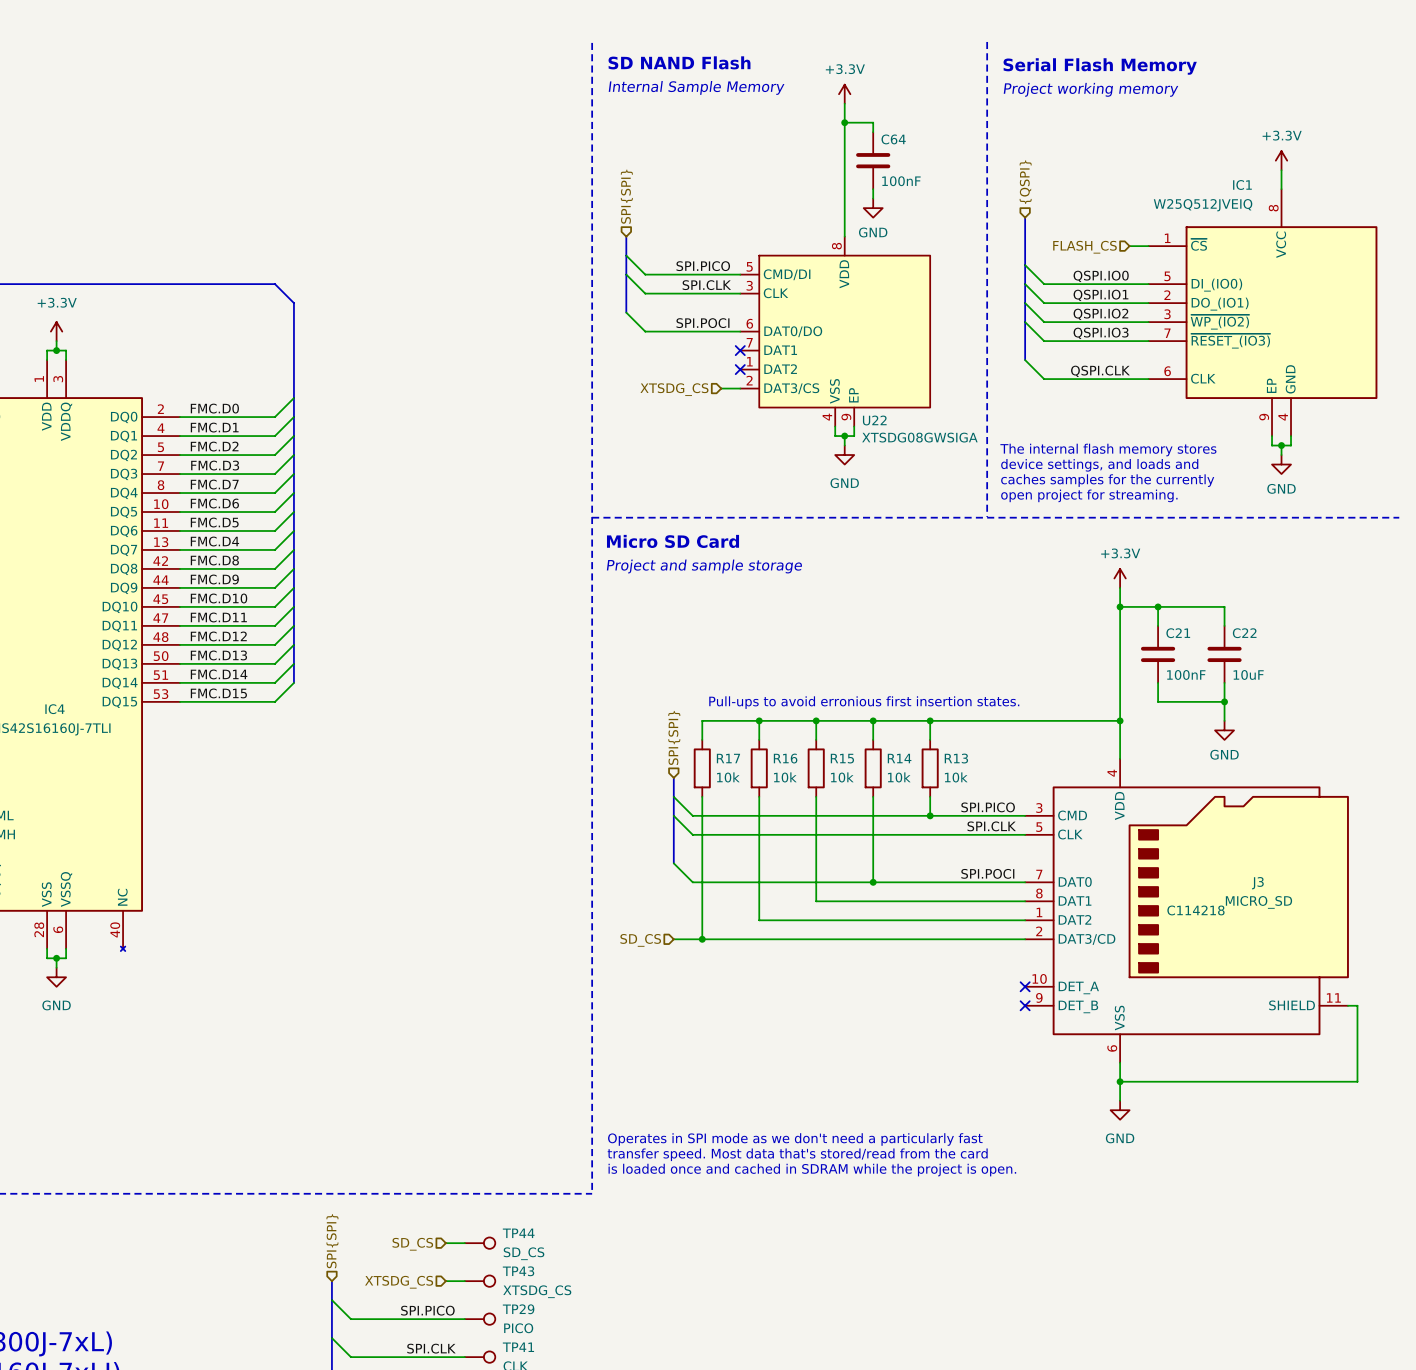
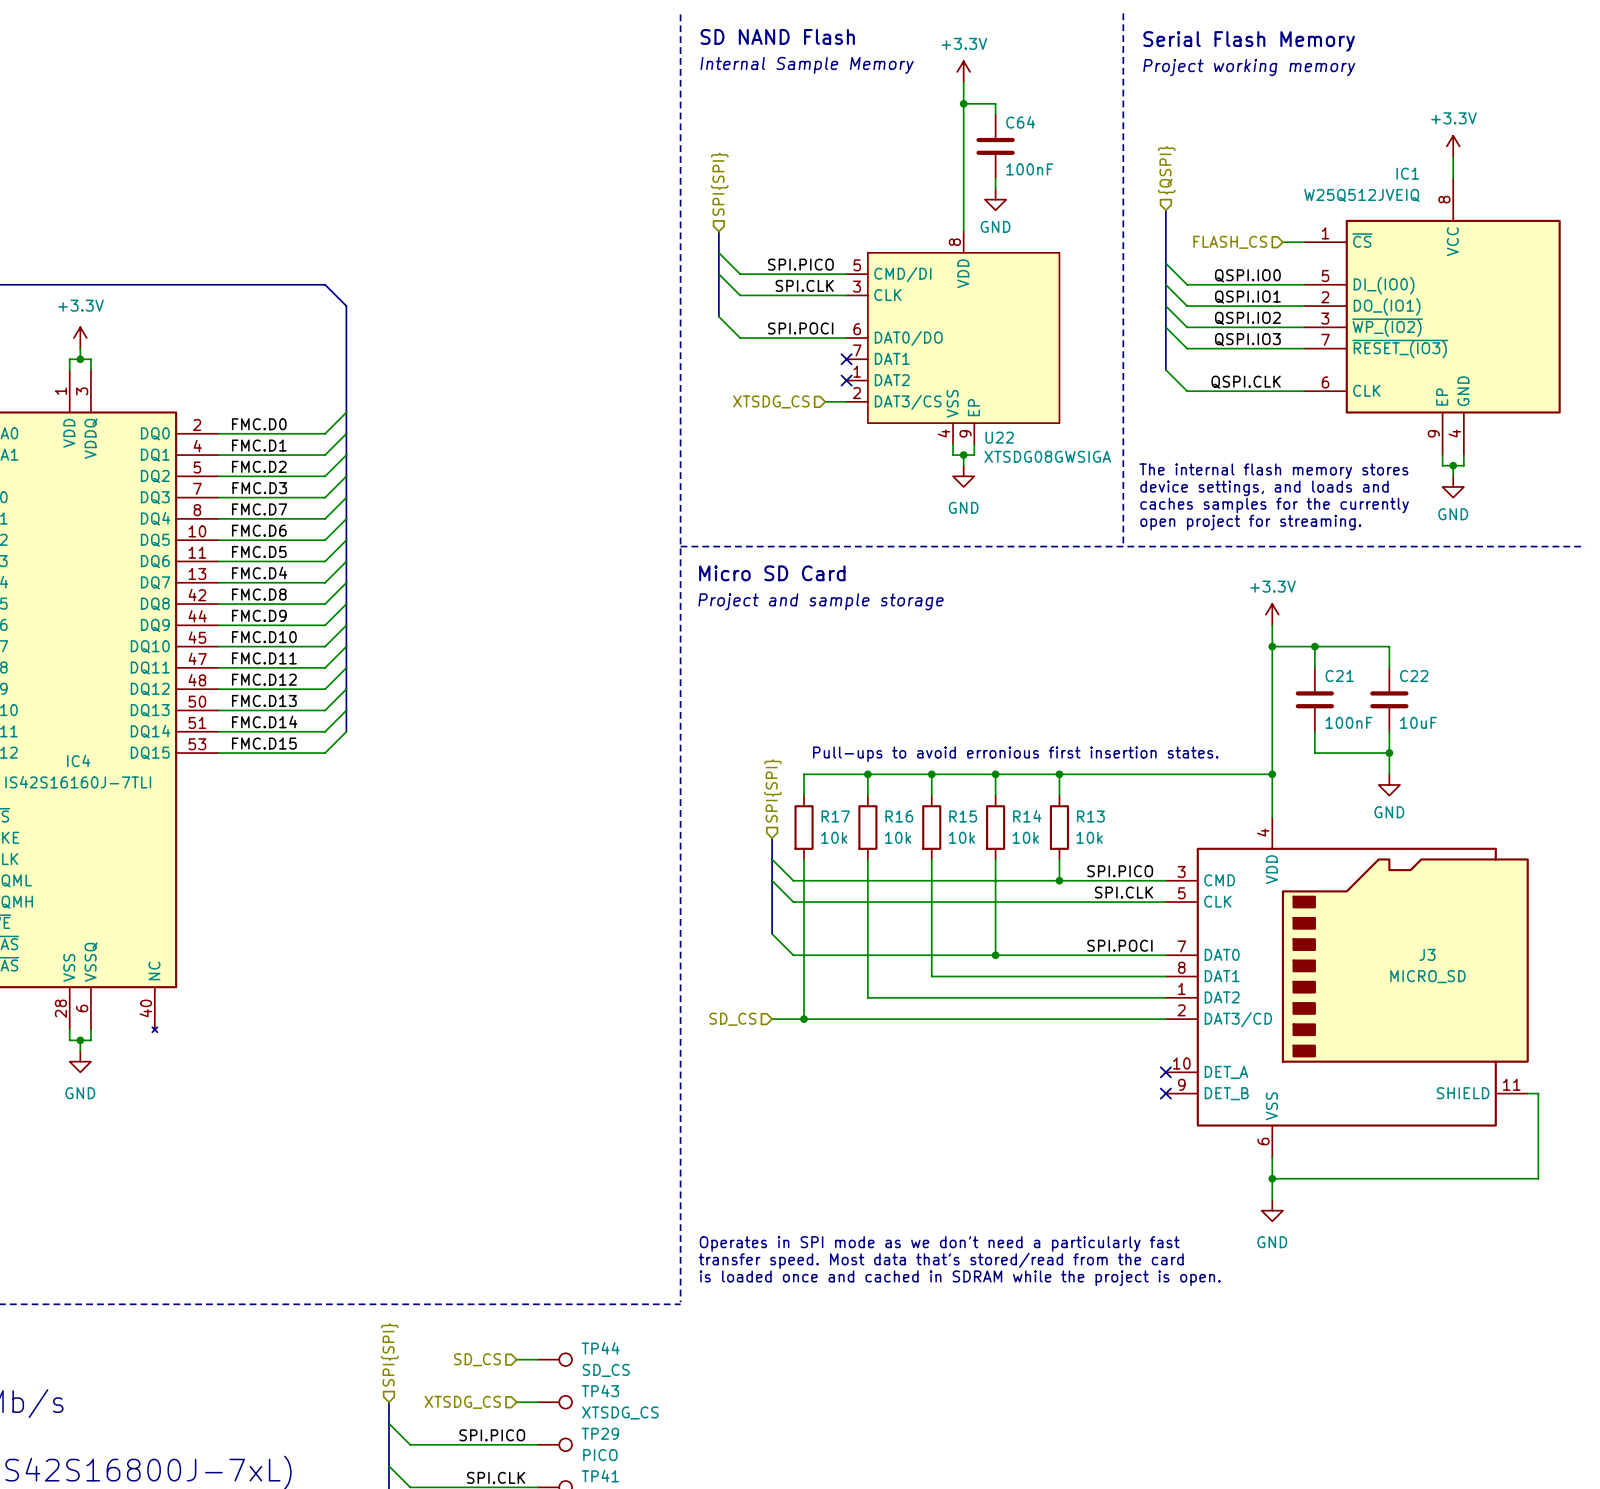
J3 text: C114218 (1195, 910) -> none

